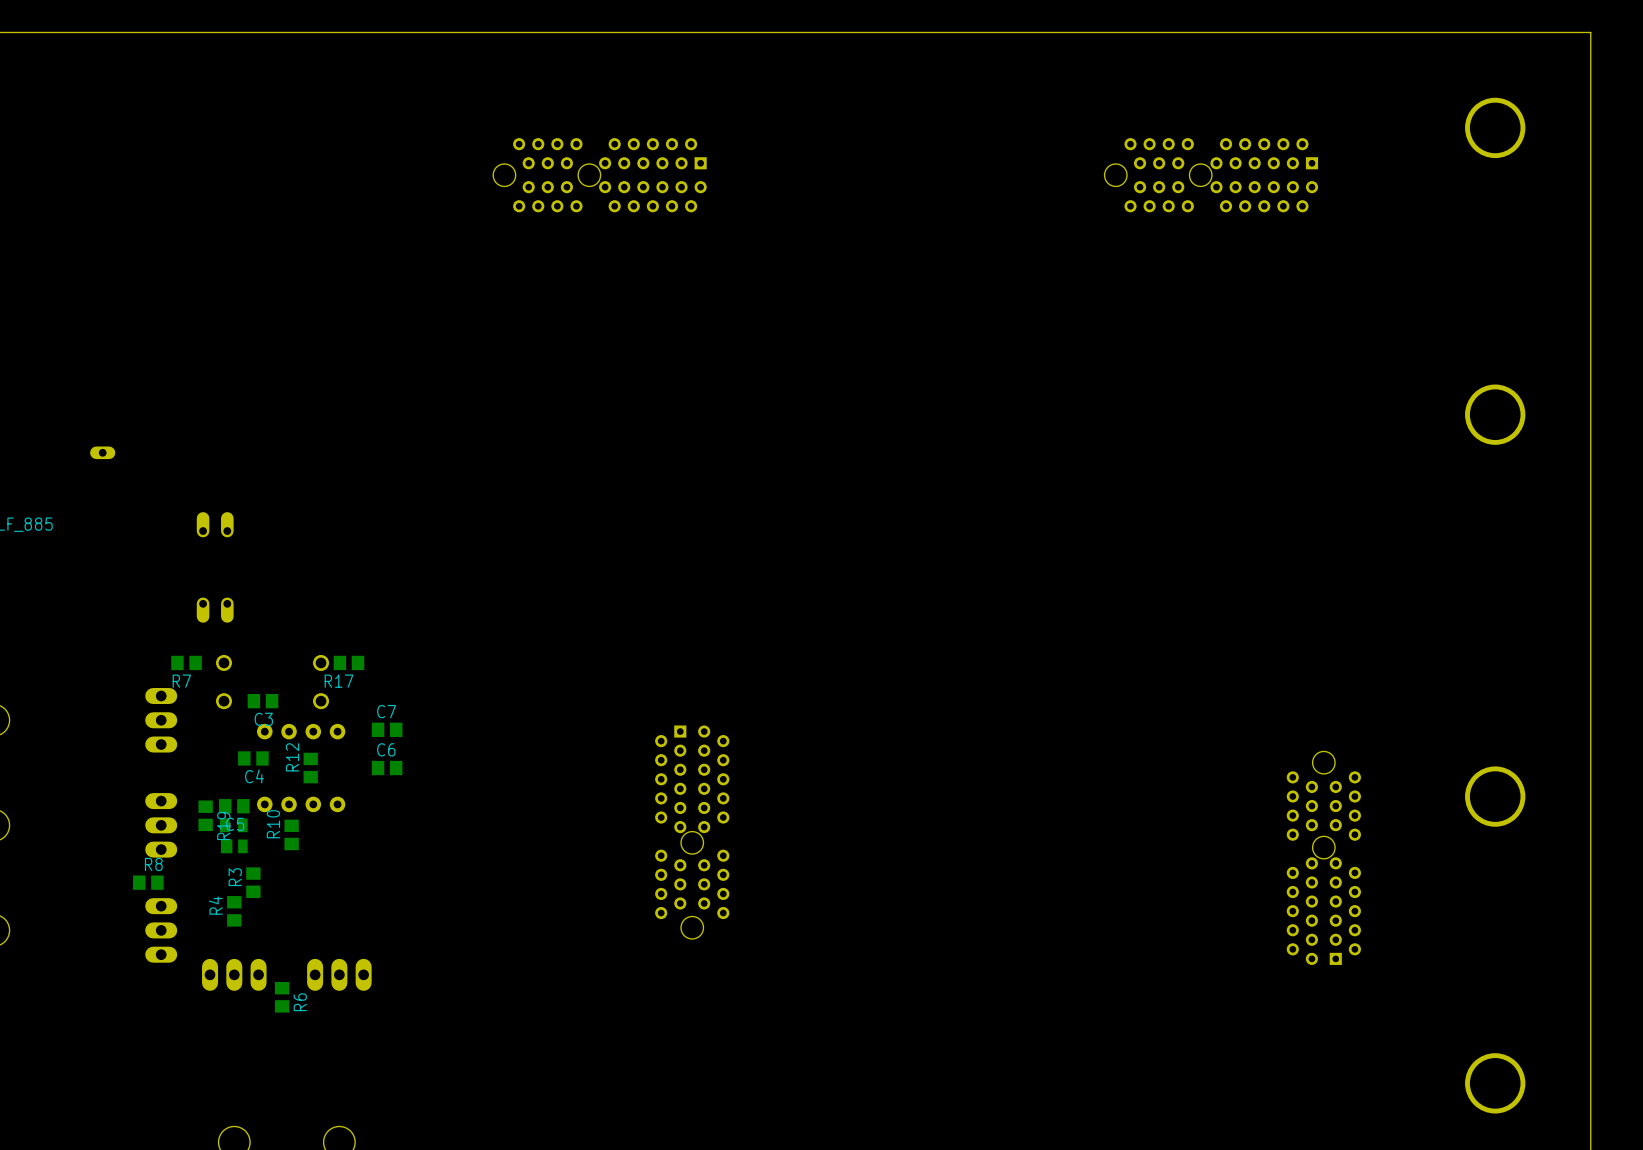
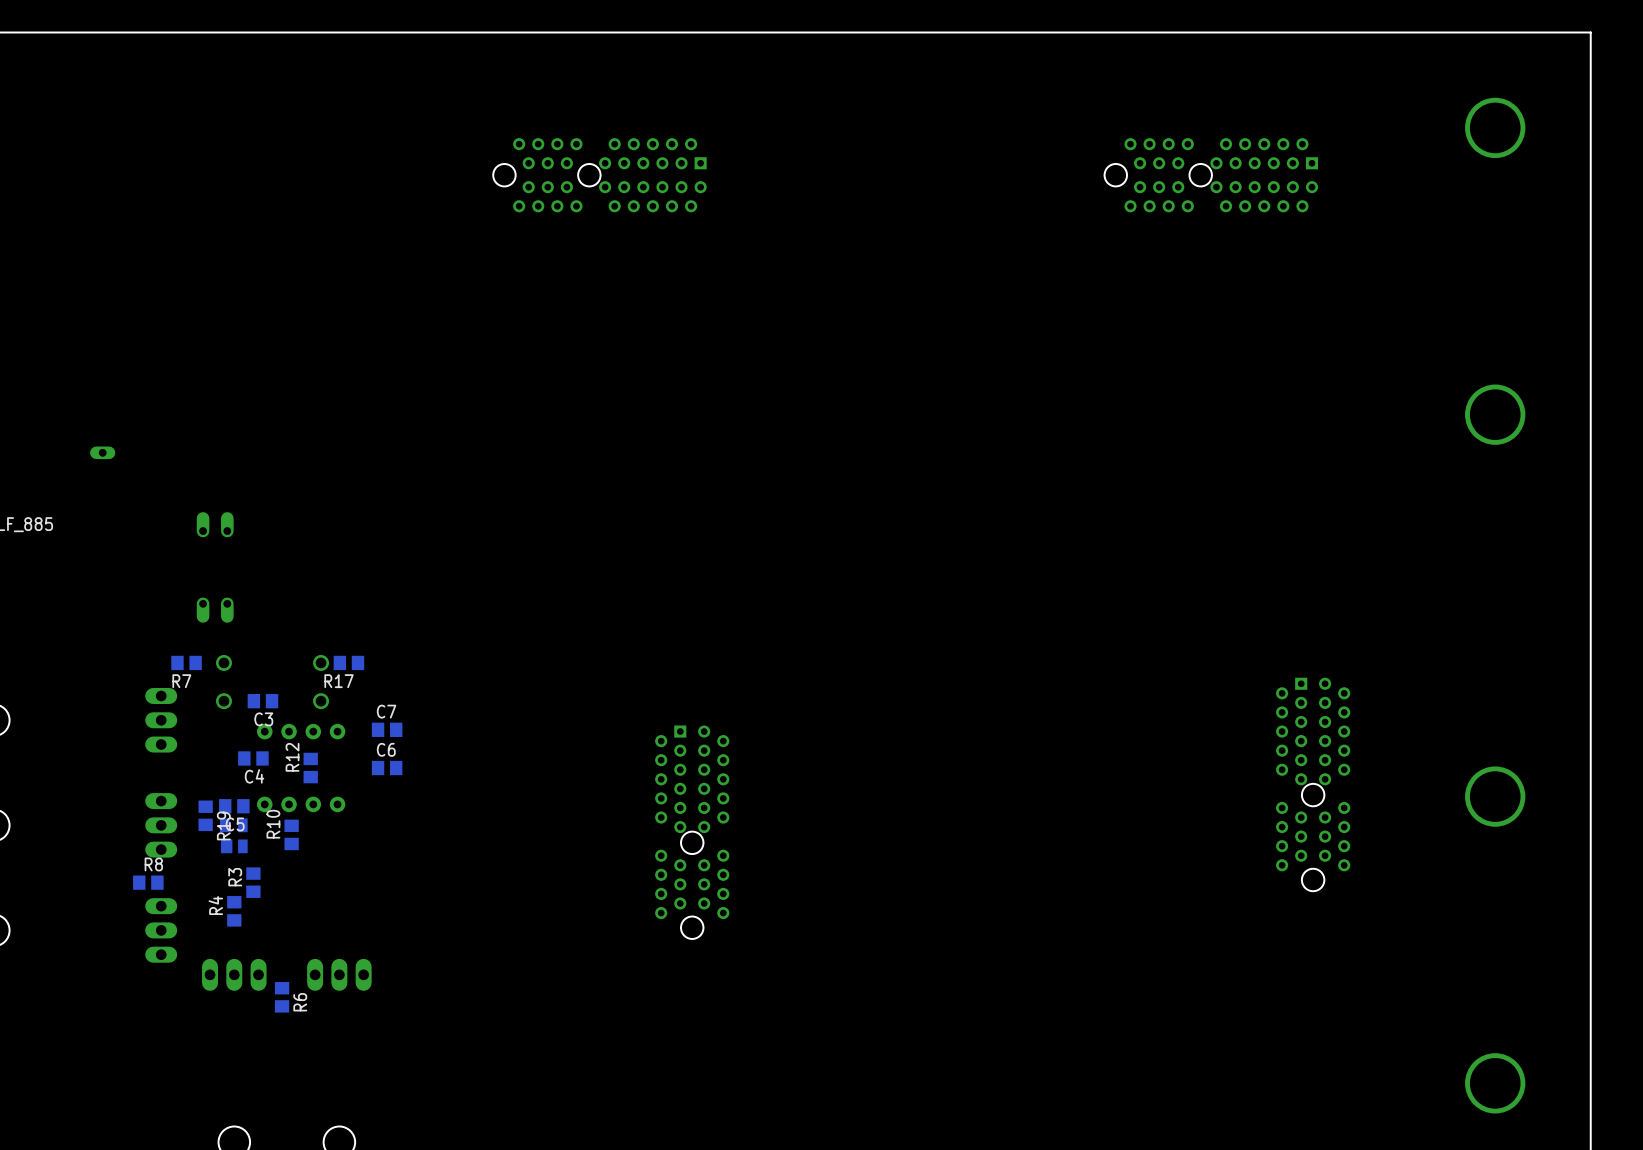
part rotation: 0° (1323, 858) -> 180° (1313, 784)

